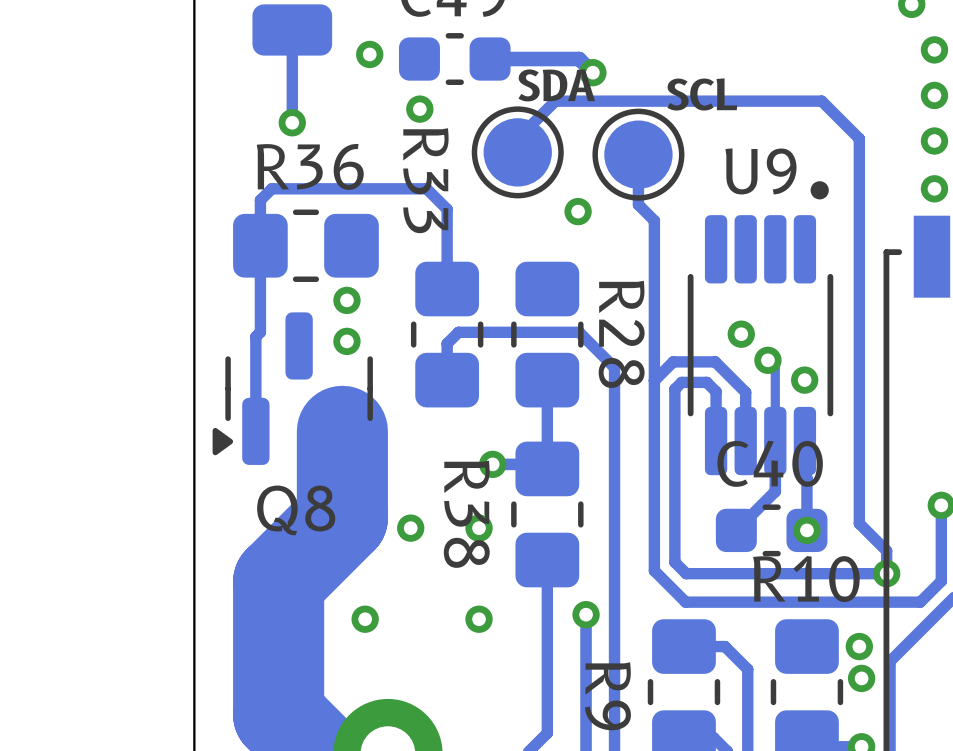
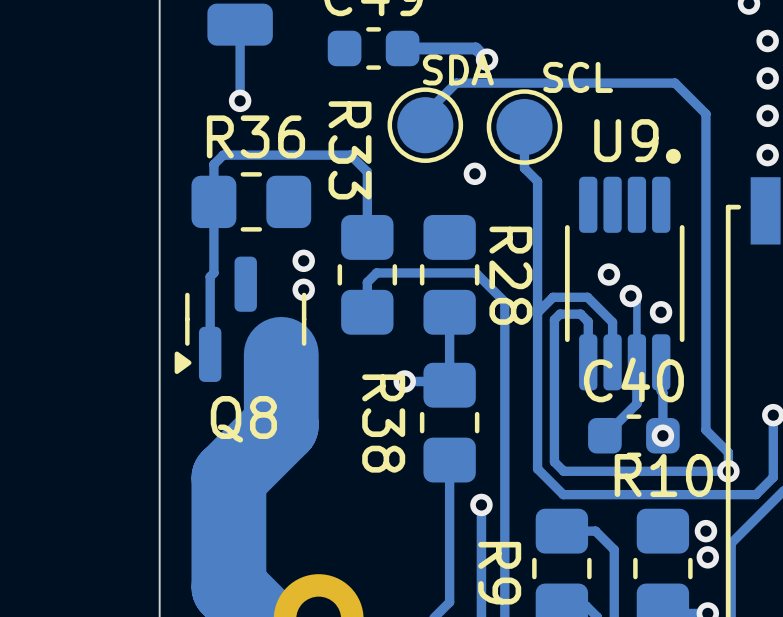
via: (369, 54) -> none
via: (419, 109) -> none
via: (346, 300) -> none
via: none -> (303, 260)
via: (346, 341) -> none
via: none -> (303, 289)
via: (410, 528) -> none
via: (479, 528) -> none
via: (365, 619) -> none
via: (479, 619) -> none

